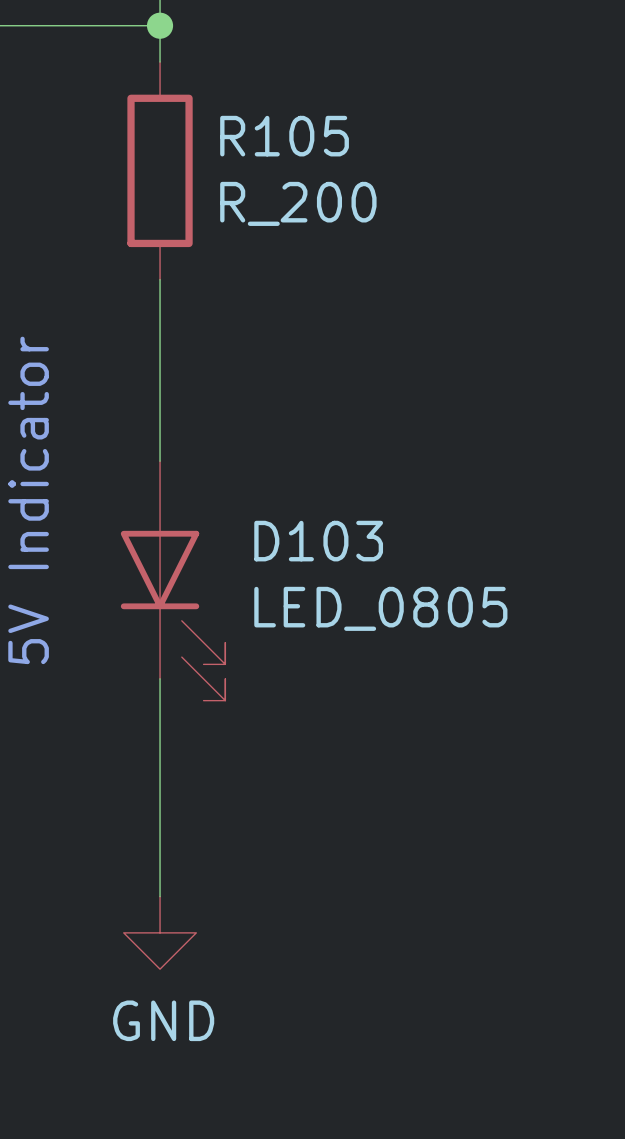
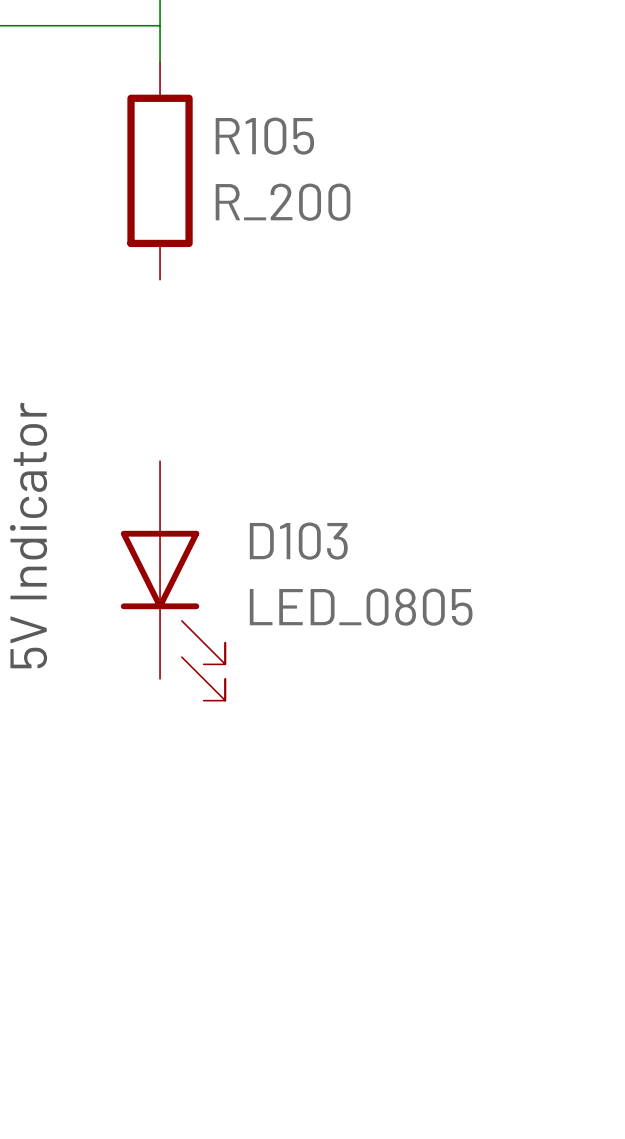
junction: (160, 25) -> none
wire: (160, 279) (160, 461) -> none
wire: (160, 678) (160, 896) -> none
power symbol: GND (160, 932) -> none

